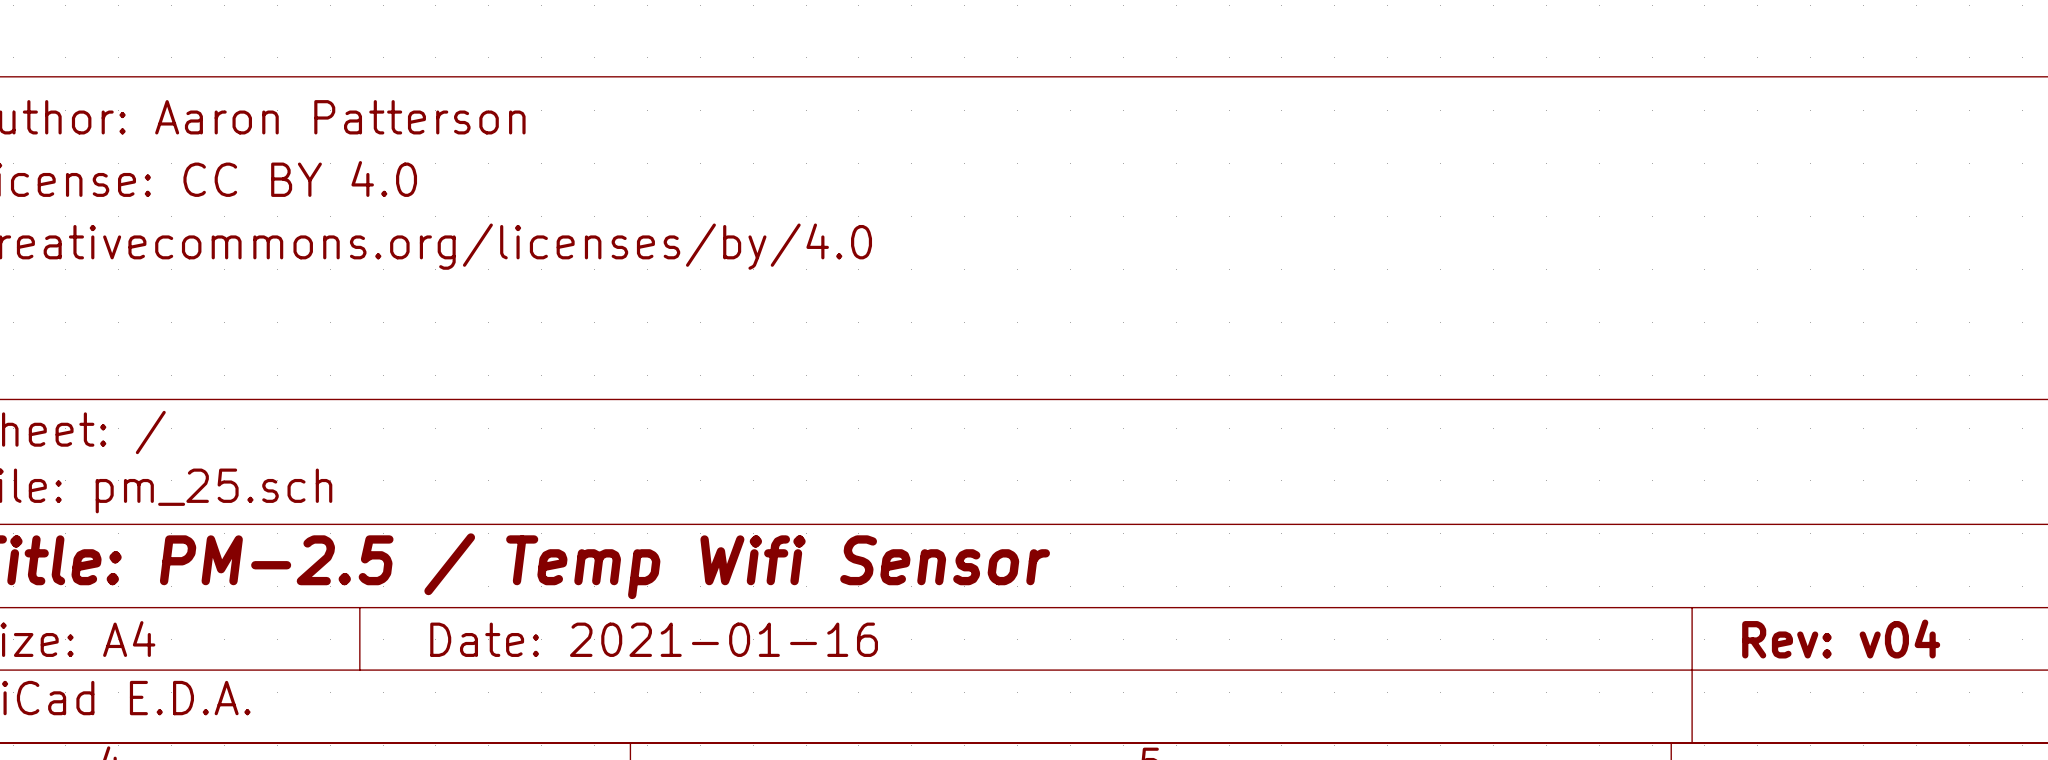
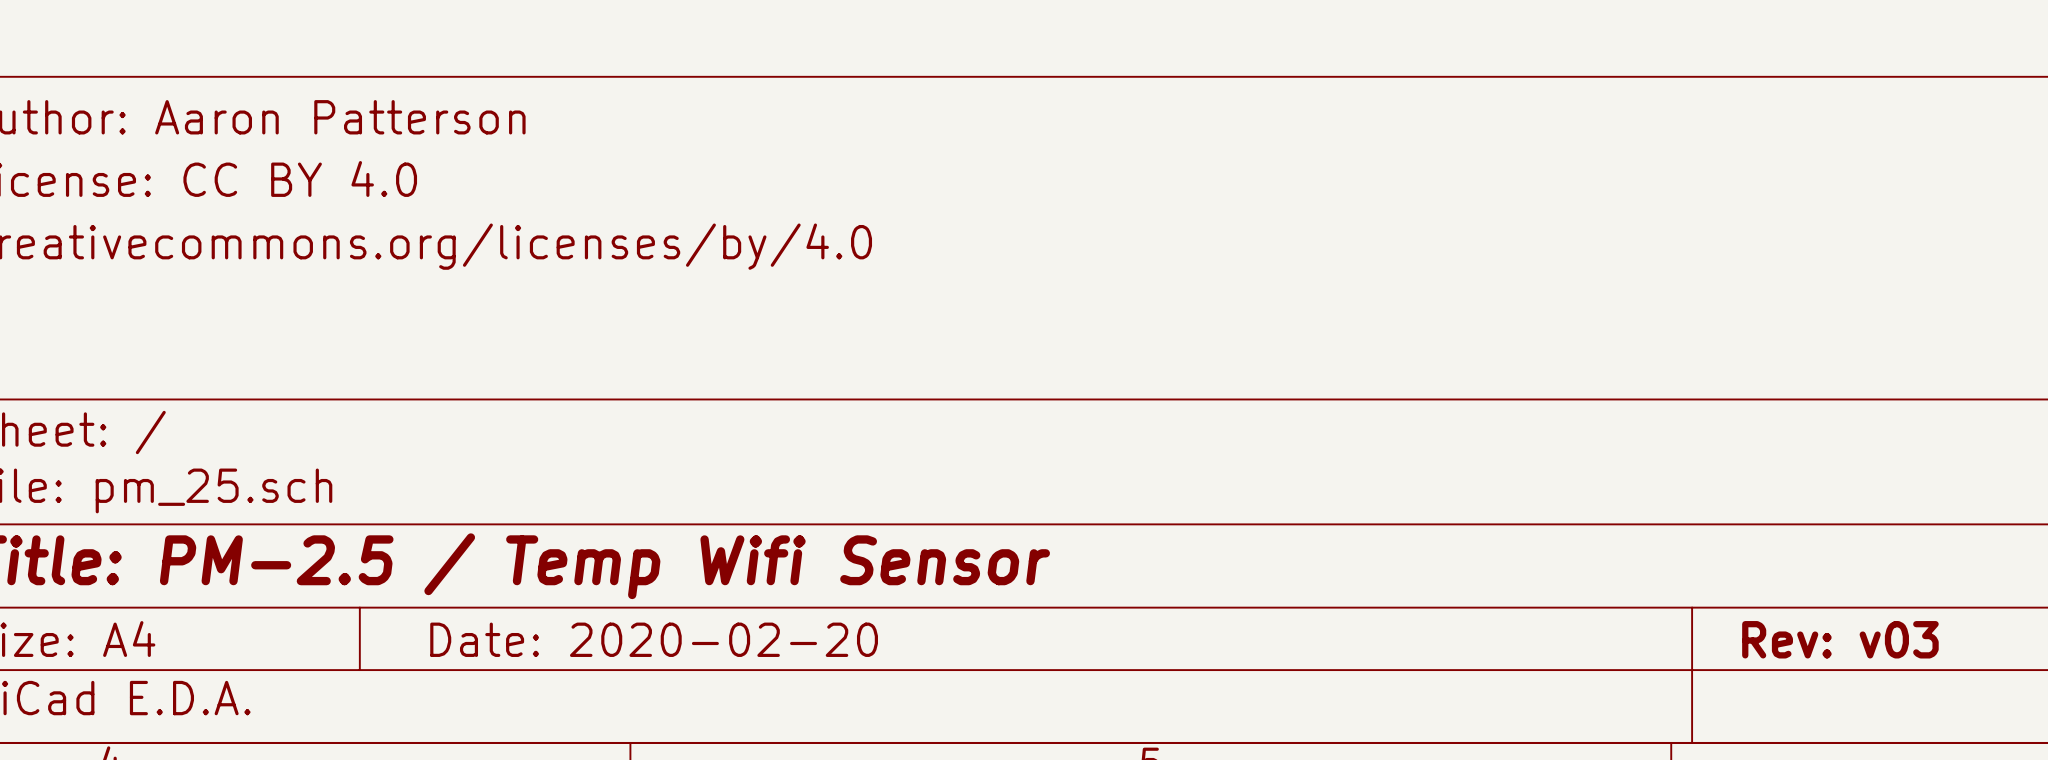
title block: Date: 2021-01-16 (654, 639) -> Date: 2020-02-20 (654, 639)
title block: Rev: v04 (1841, 639) -> Rev: v03 (1840, 639)

